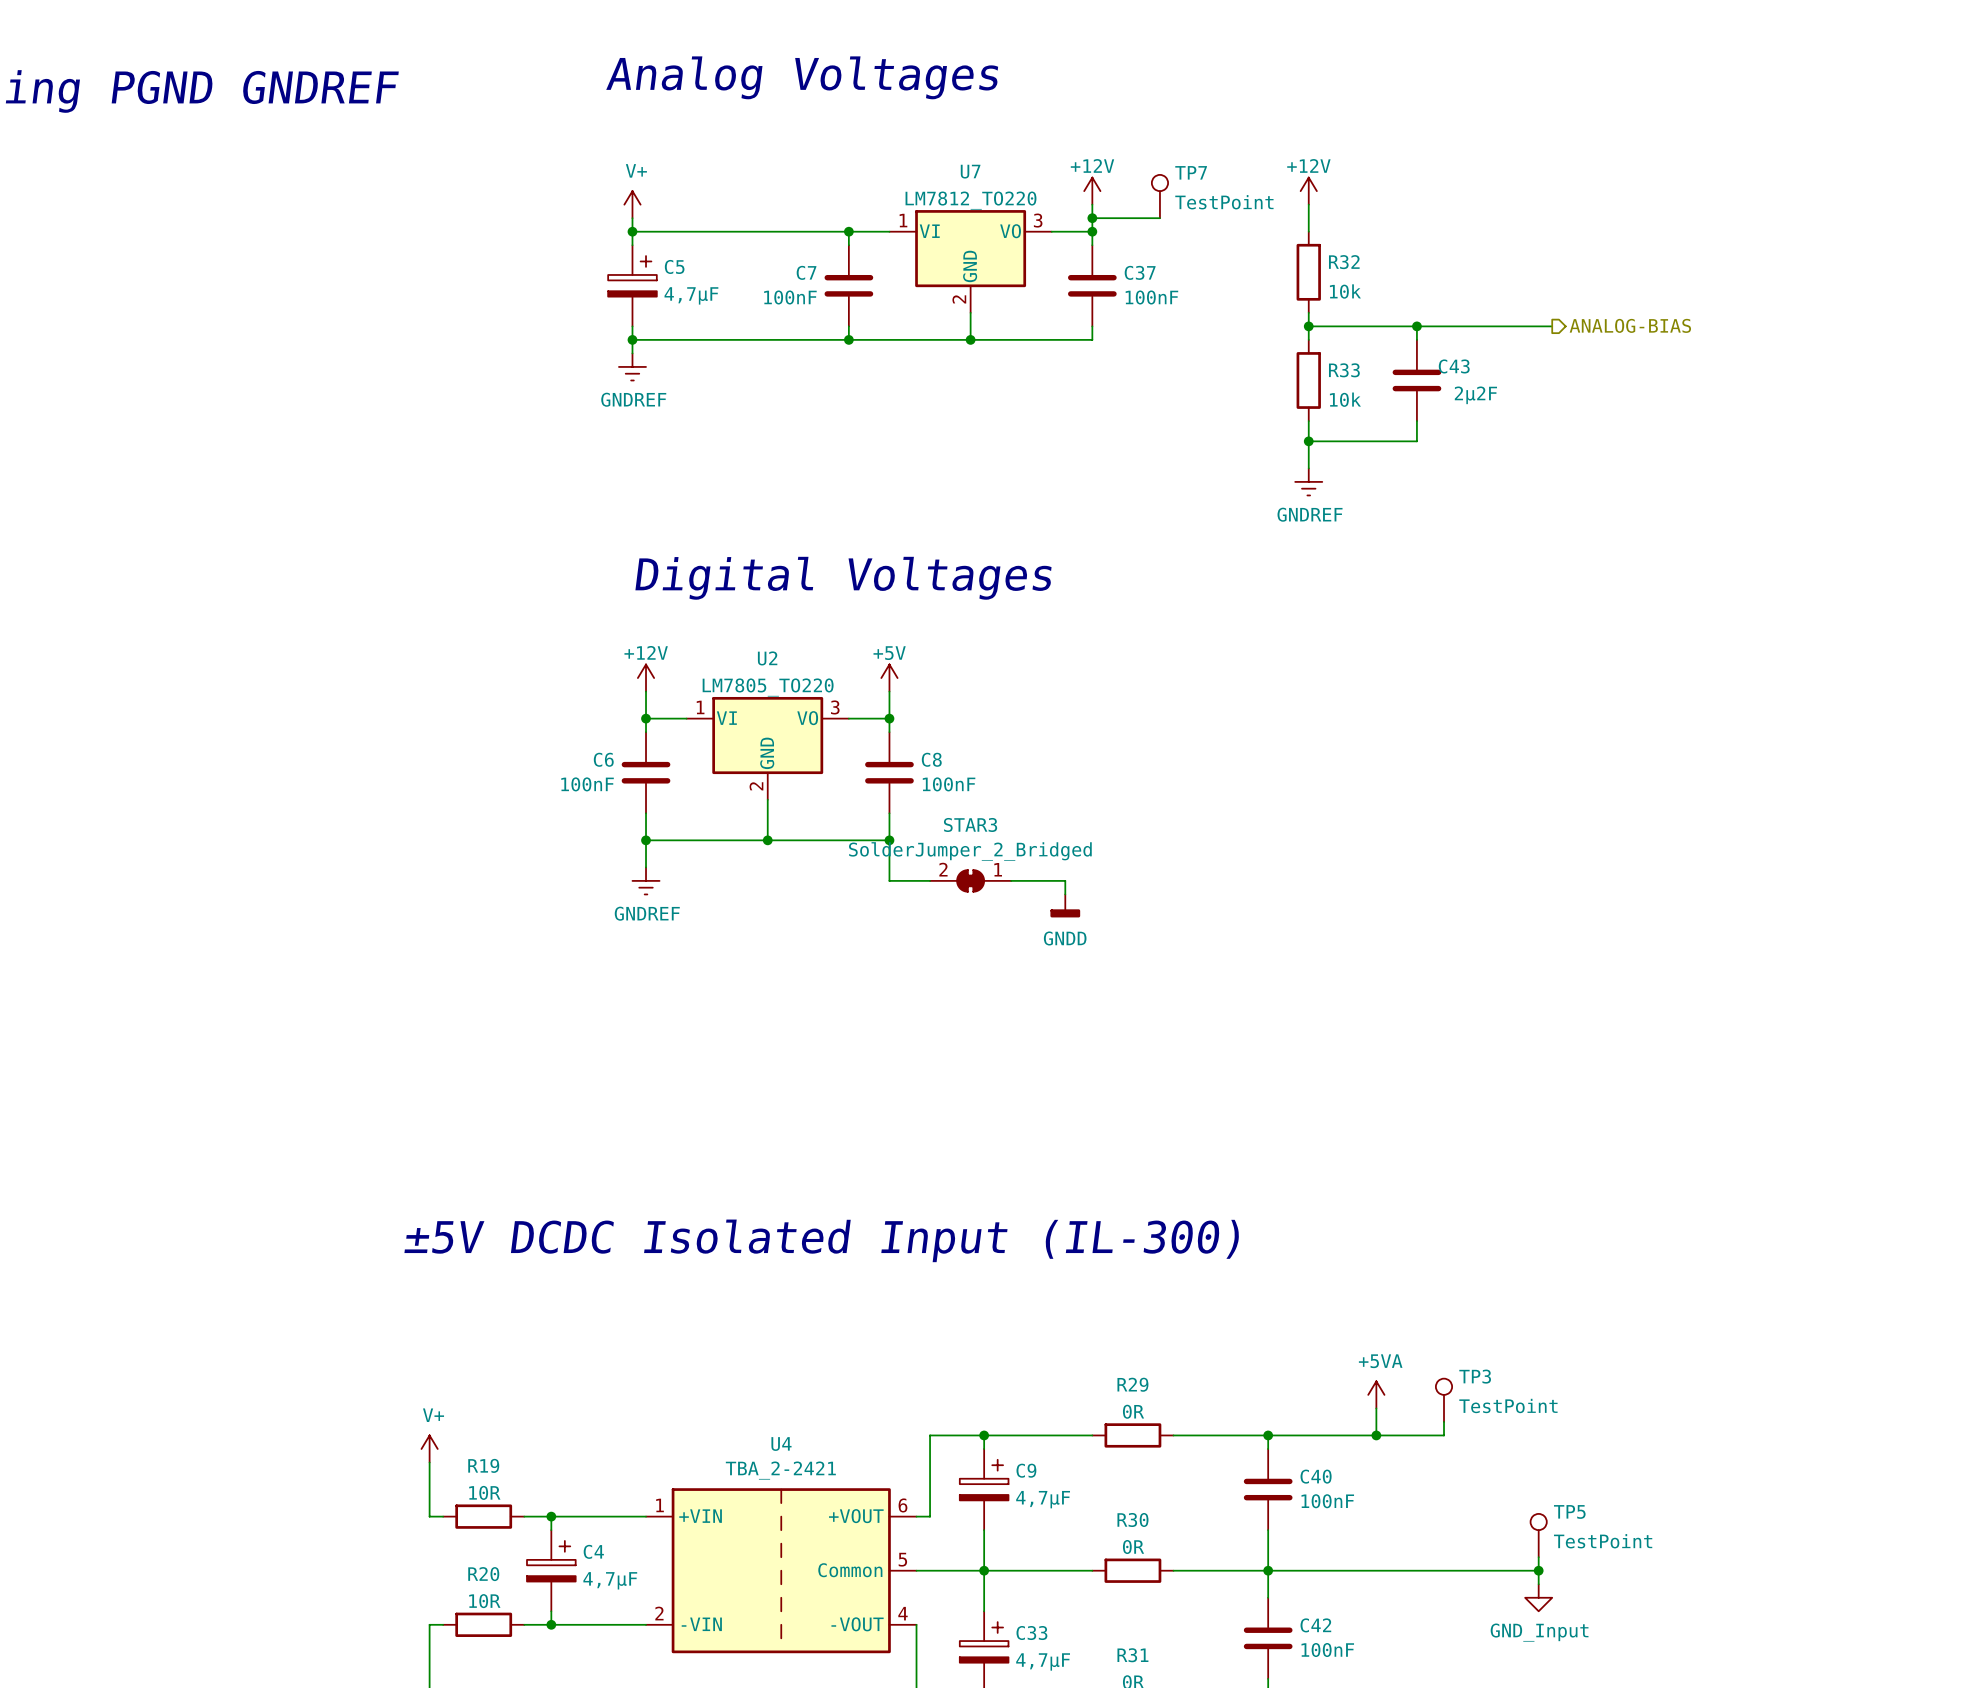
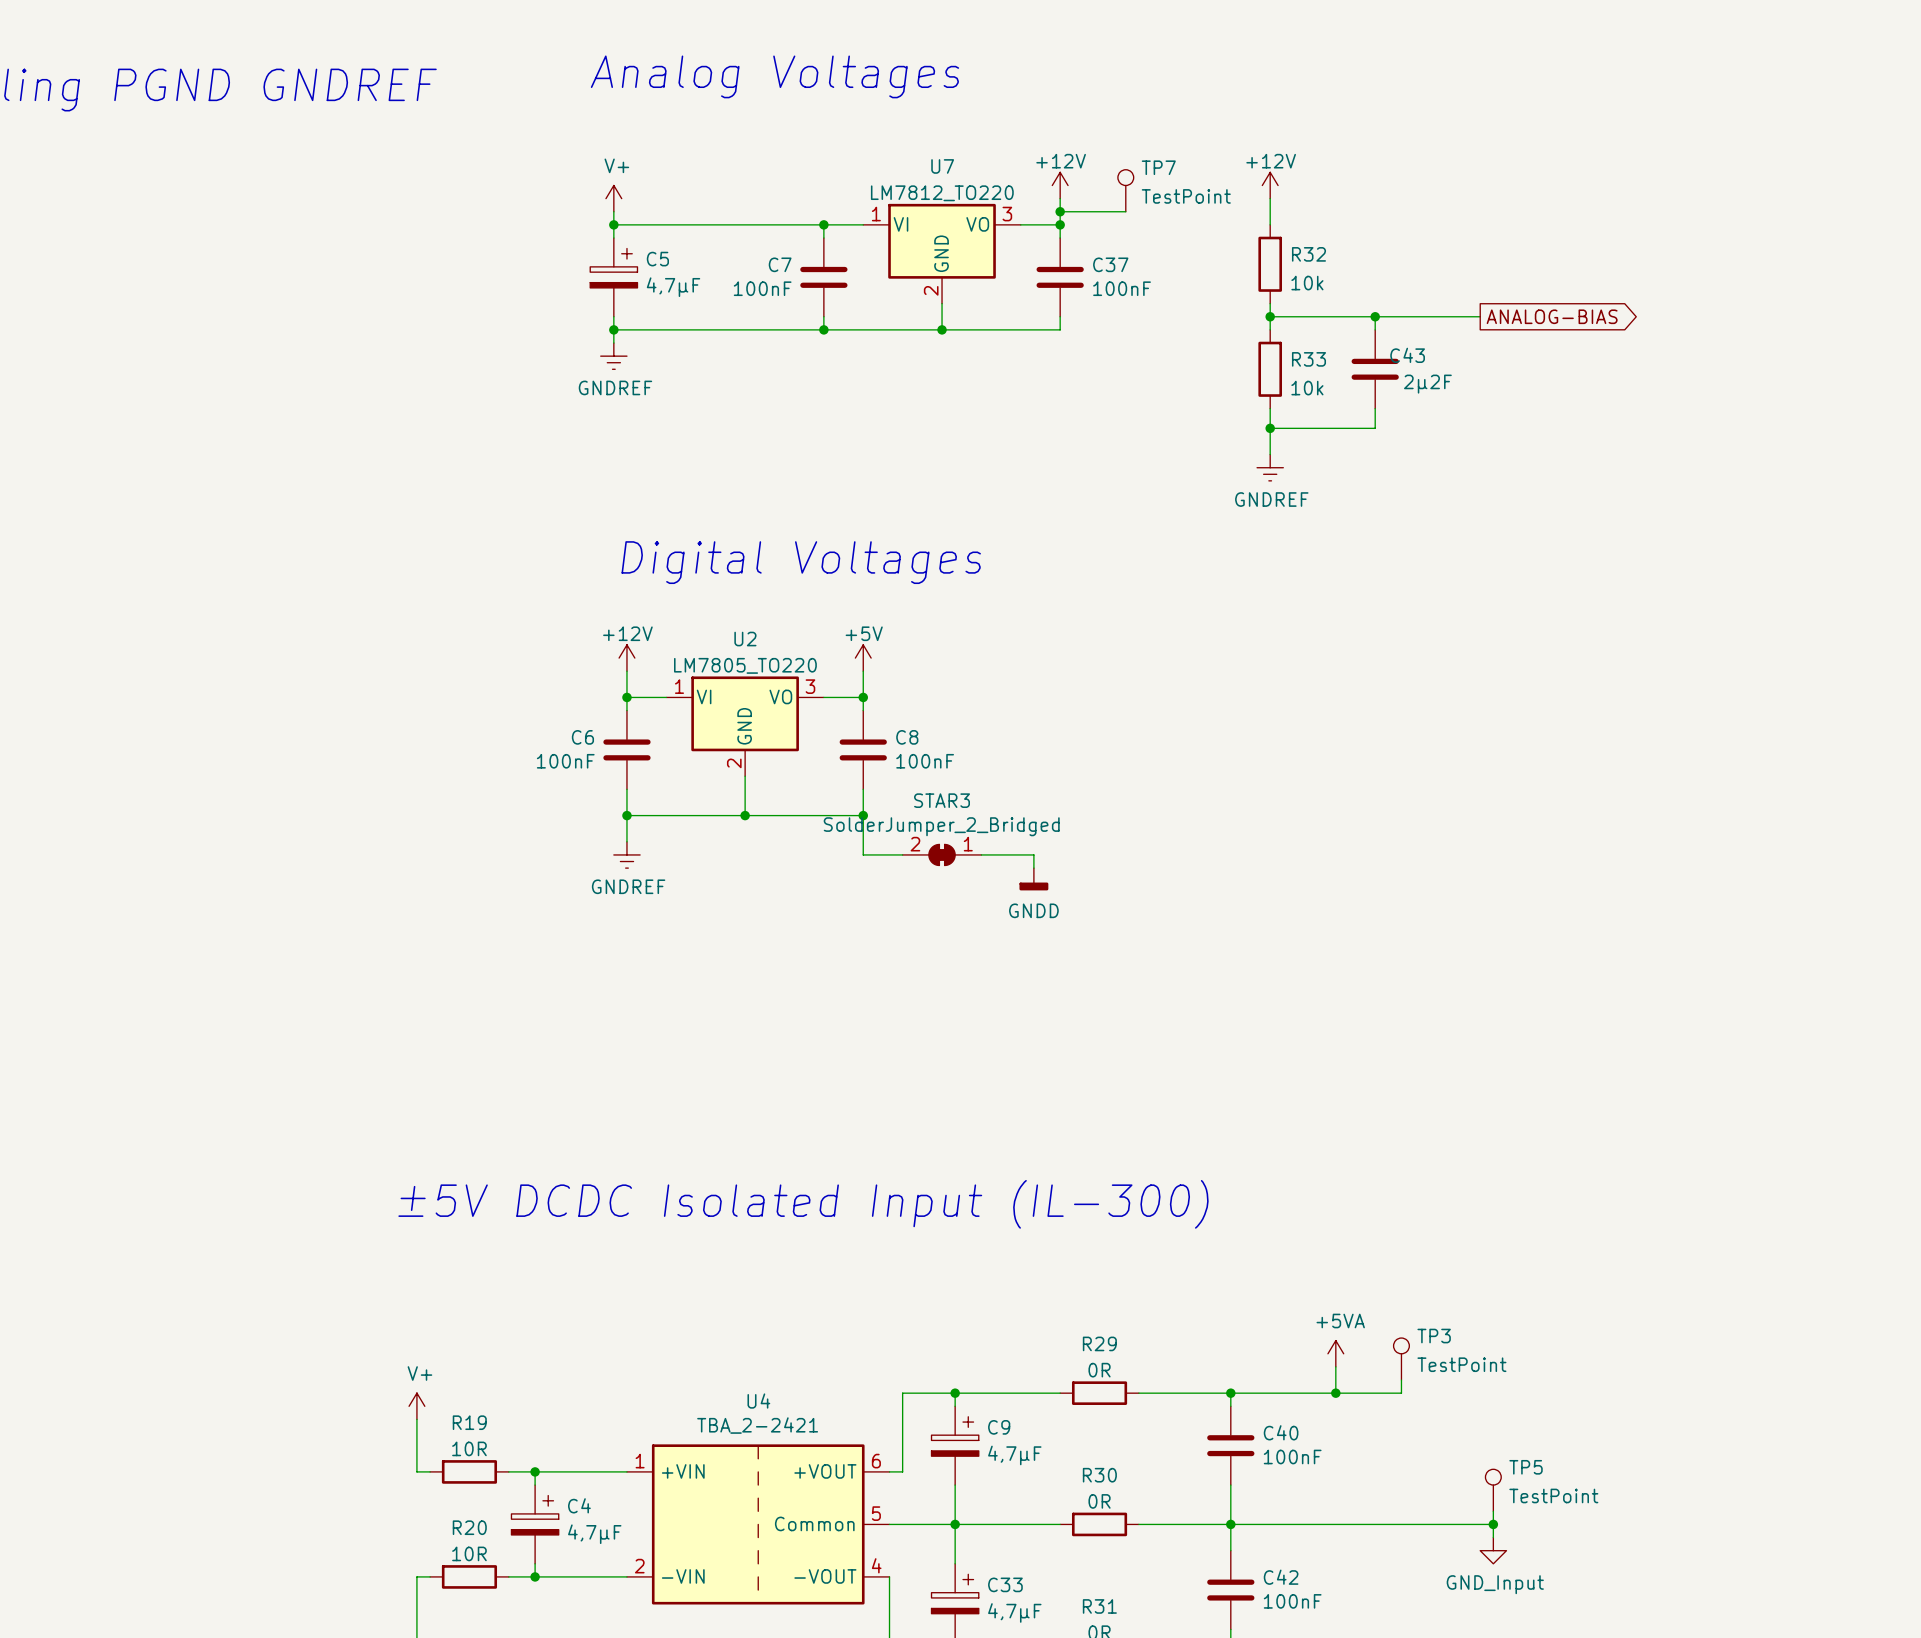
hierarchical label: ANALOG-BIAS (1630, 325) -> none
wire: (1525, 326) (1552, 326) -> none
global label: none -> ANALOG-BIAS (1552, 316)

